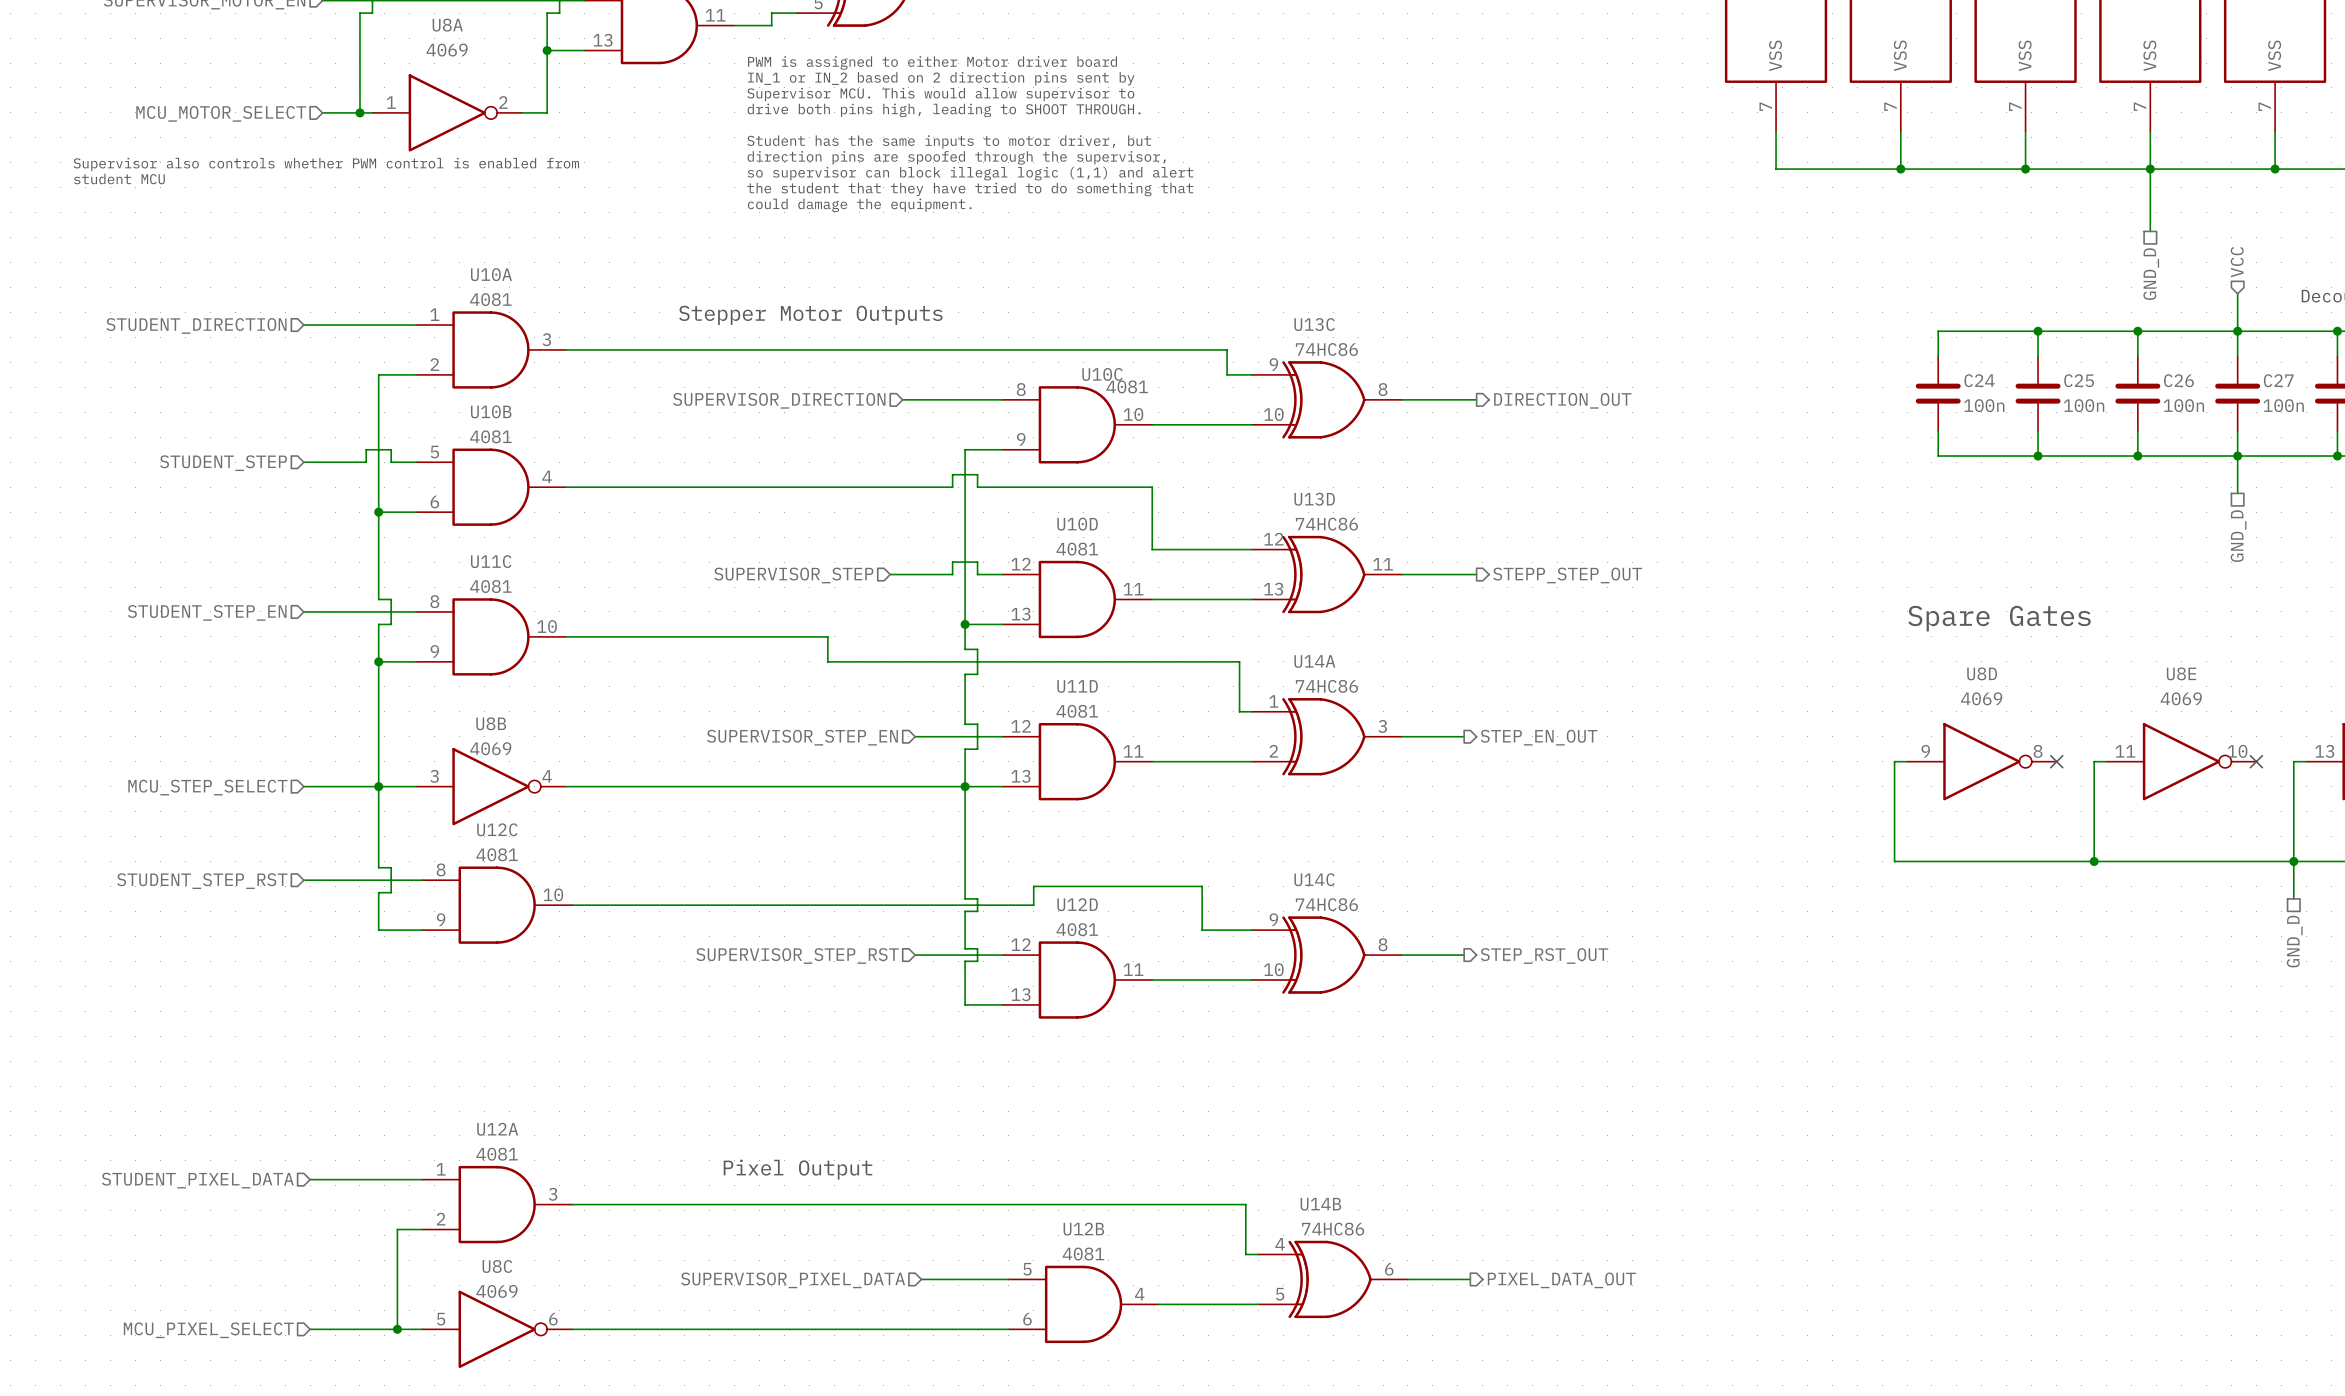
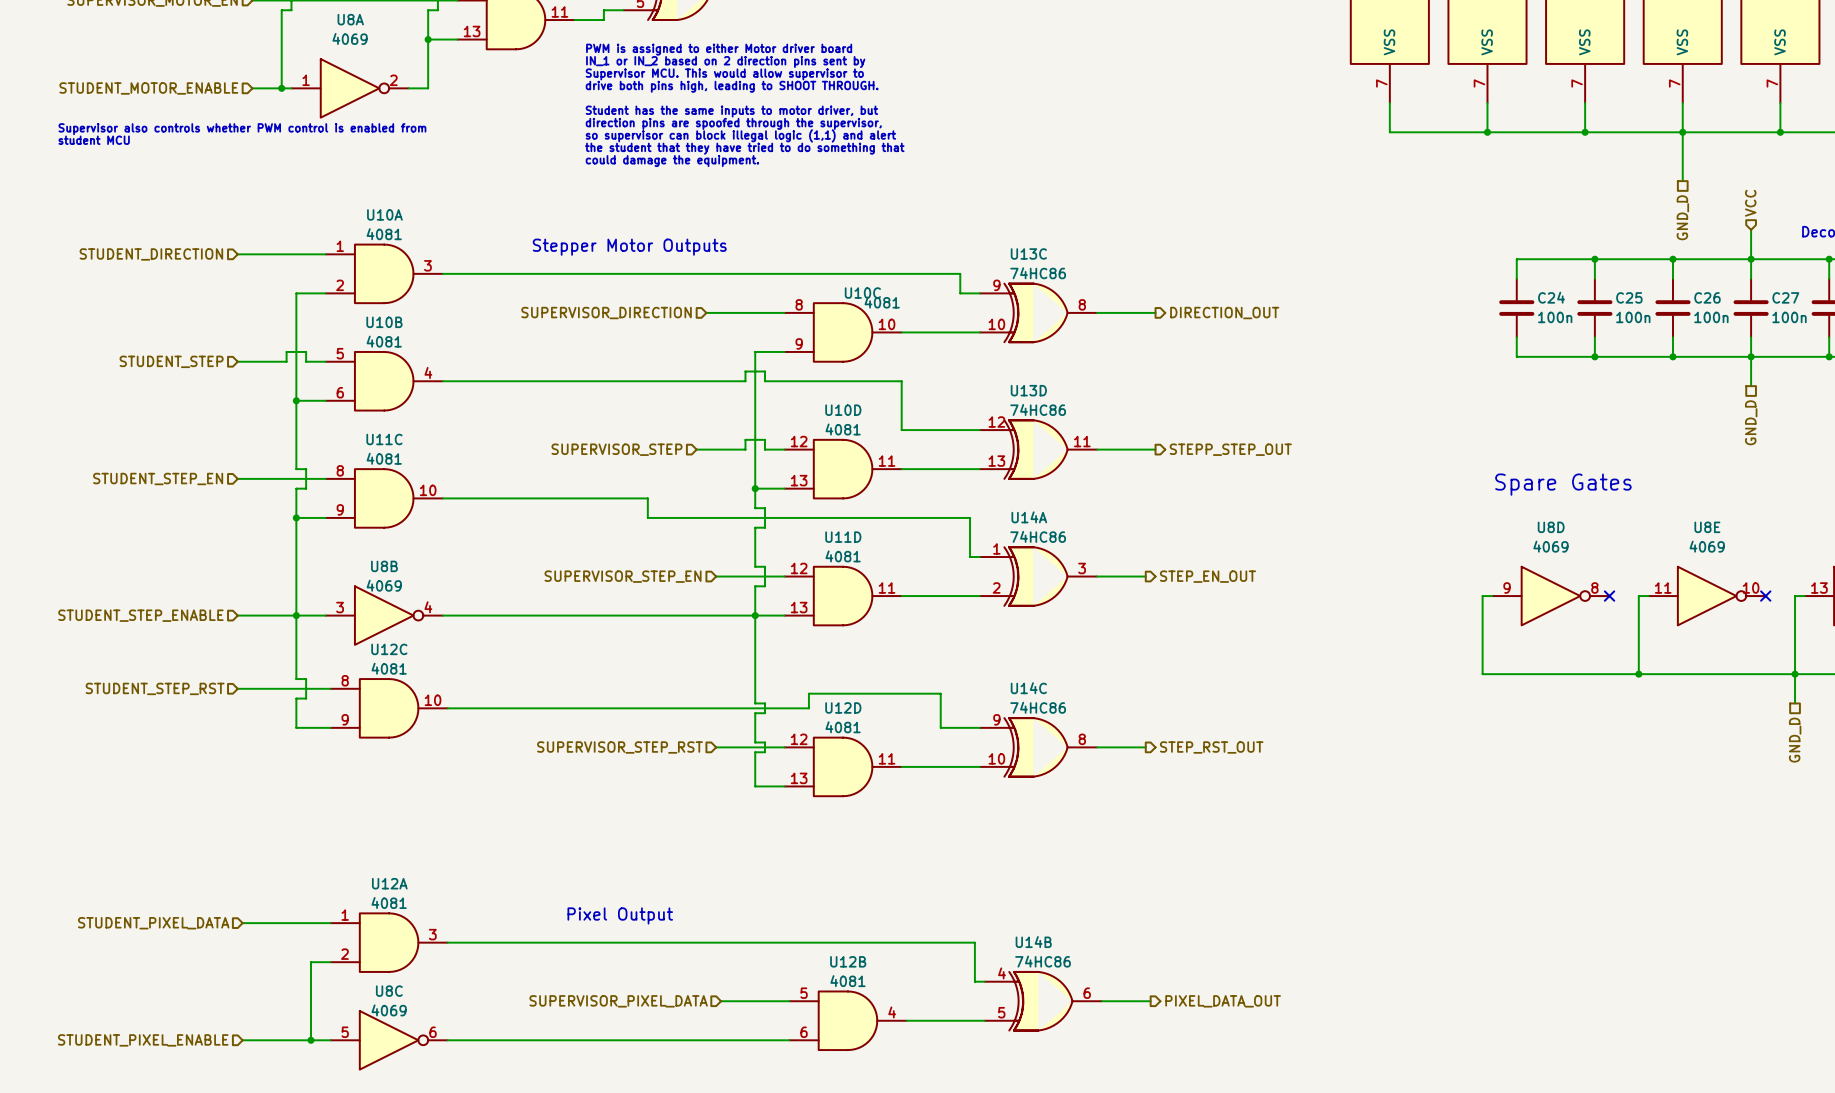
hierarchical label: MCU_MOTOR_SELECT (221, 113) -> STUDENT_MOTOR_ENABLE (148, 88)
hierarchical label: MCU_STEP_SELECT (207, 787) -> STUDENT_STEP_ENABLE (140, 615)
hierarchical label: MCU_PIXEL_SELECT (208, 1330) -> STUDENT_PIXEL_ENABLE (143, 1040)

